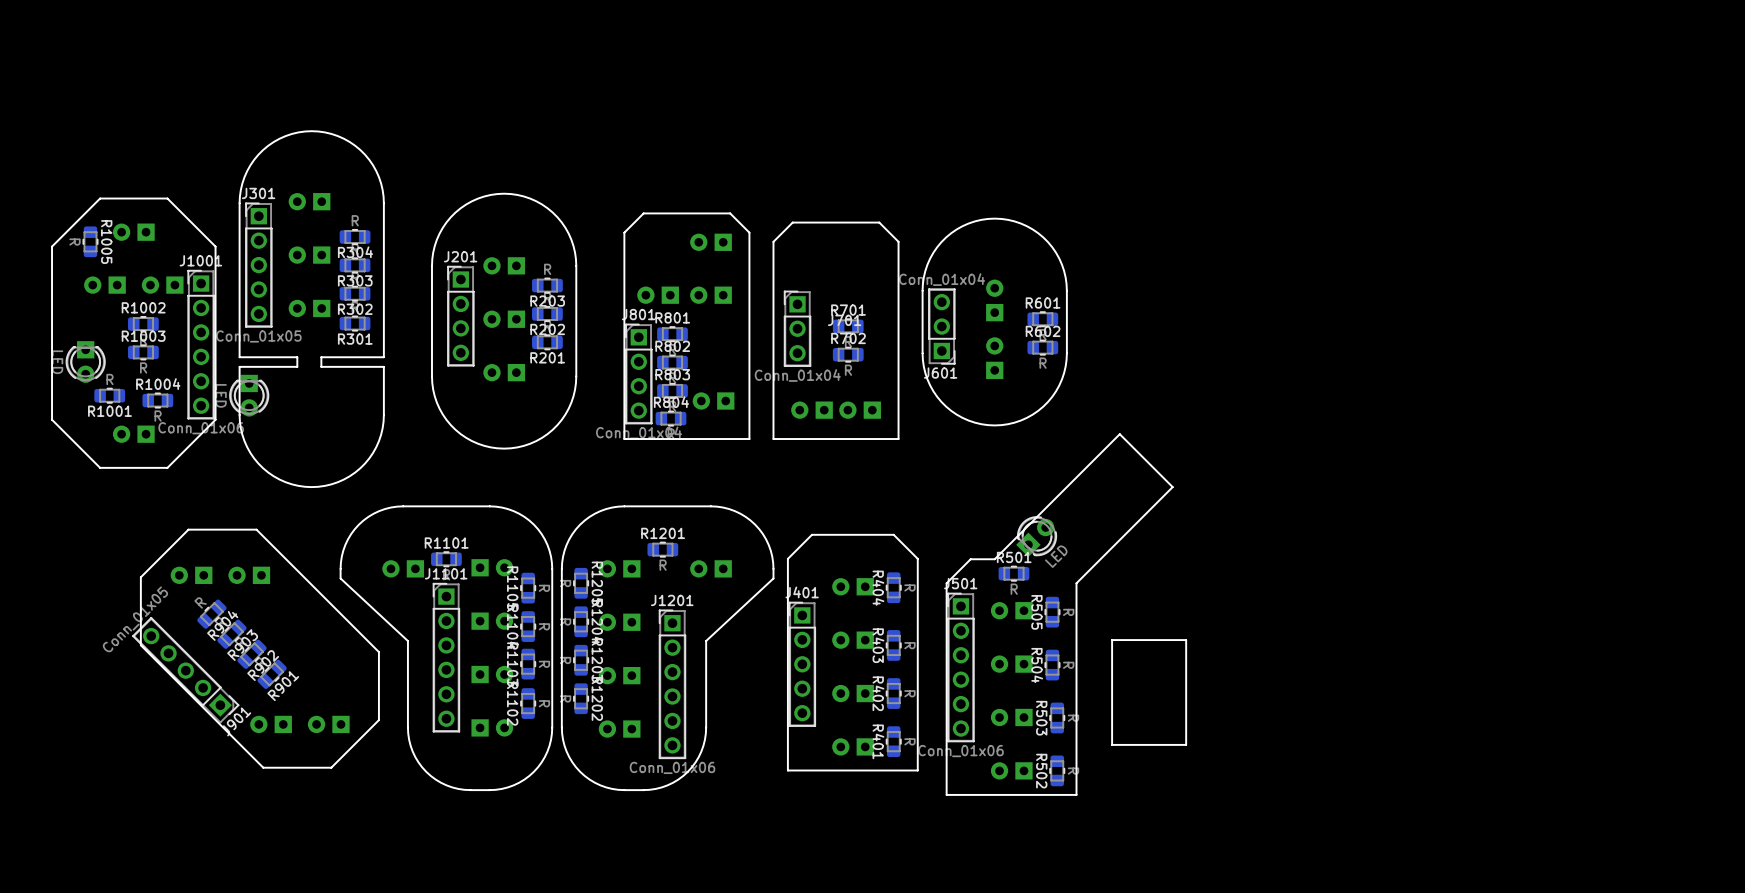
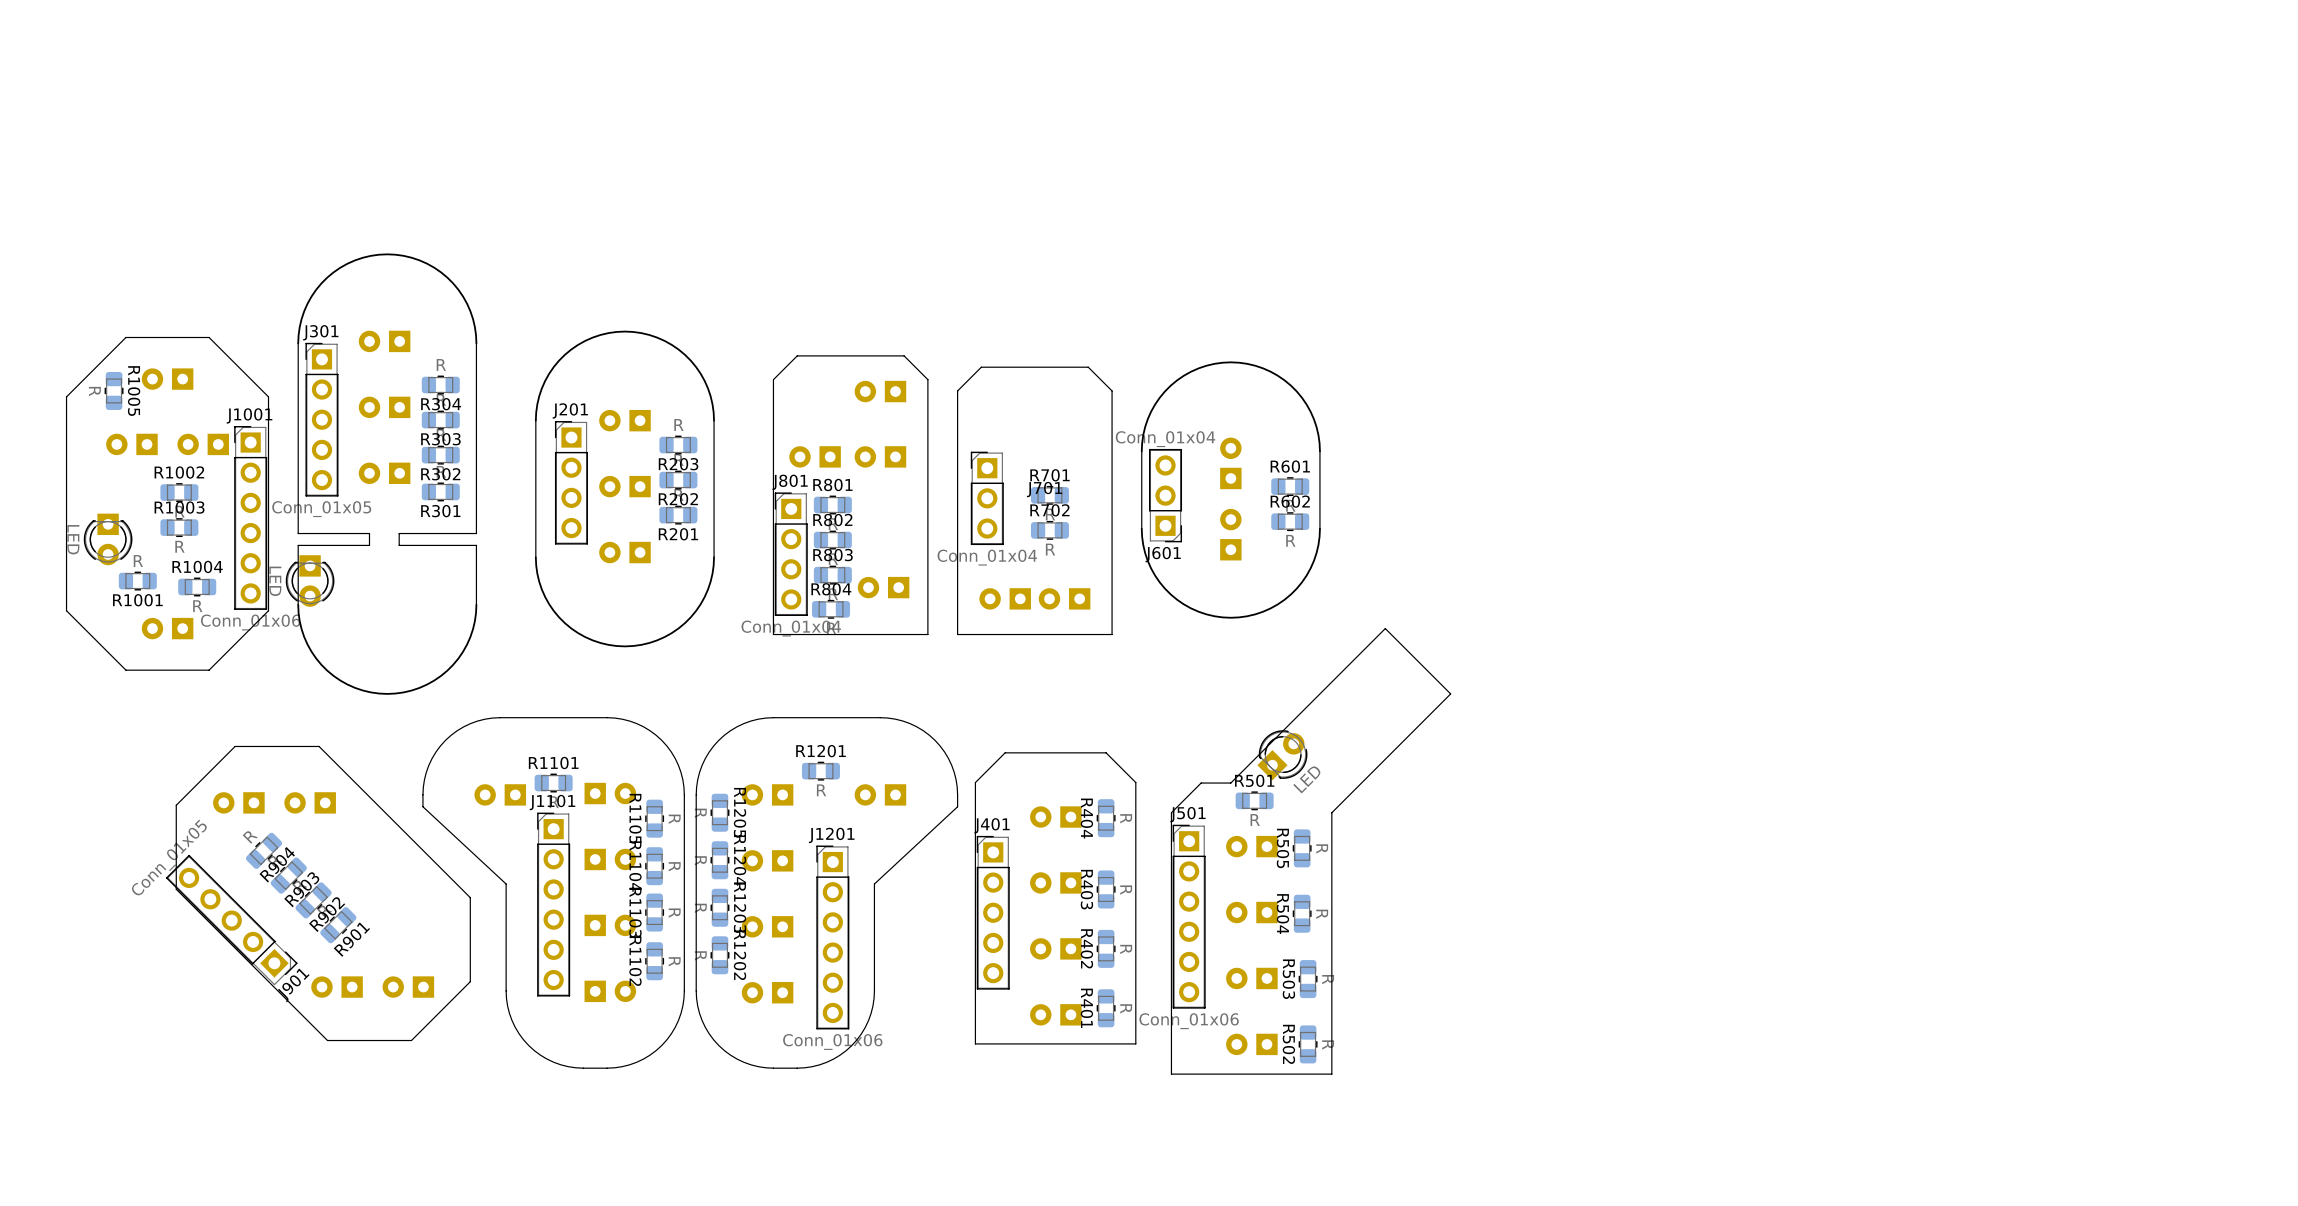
board edge: (1186, 640) (1112, 640) (1112, 744) (1186, 744) (1186, 640) -> none

